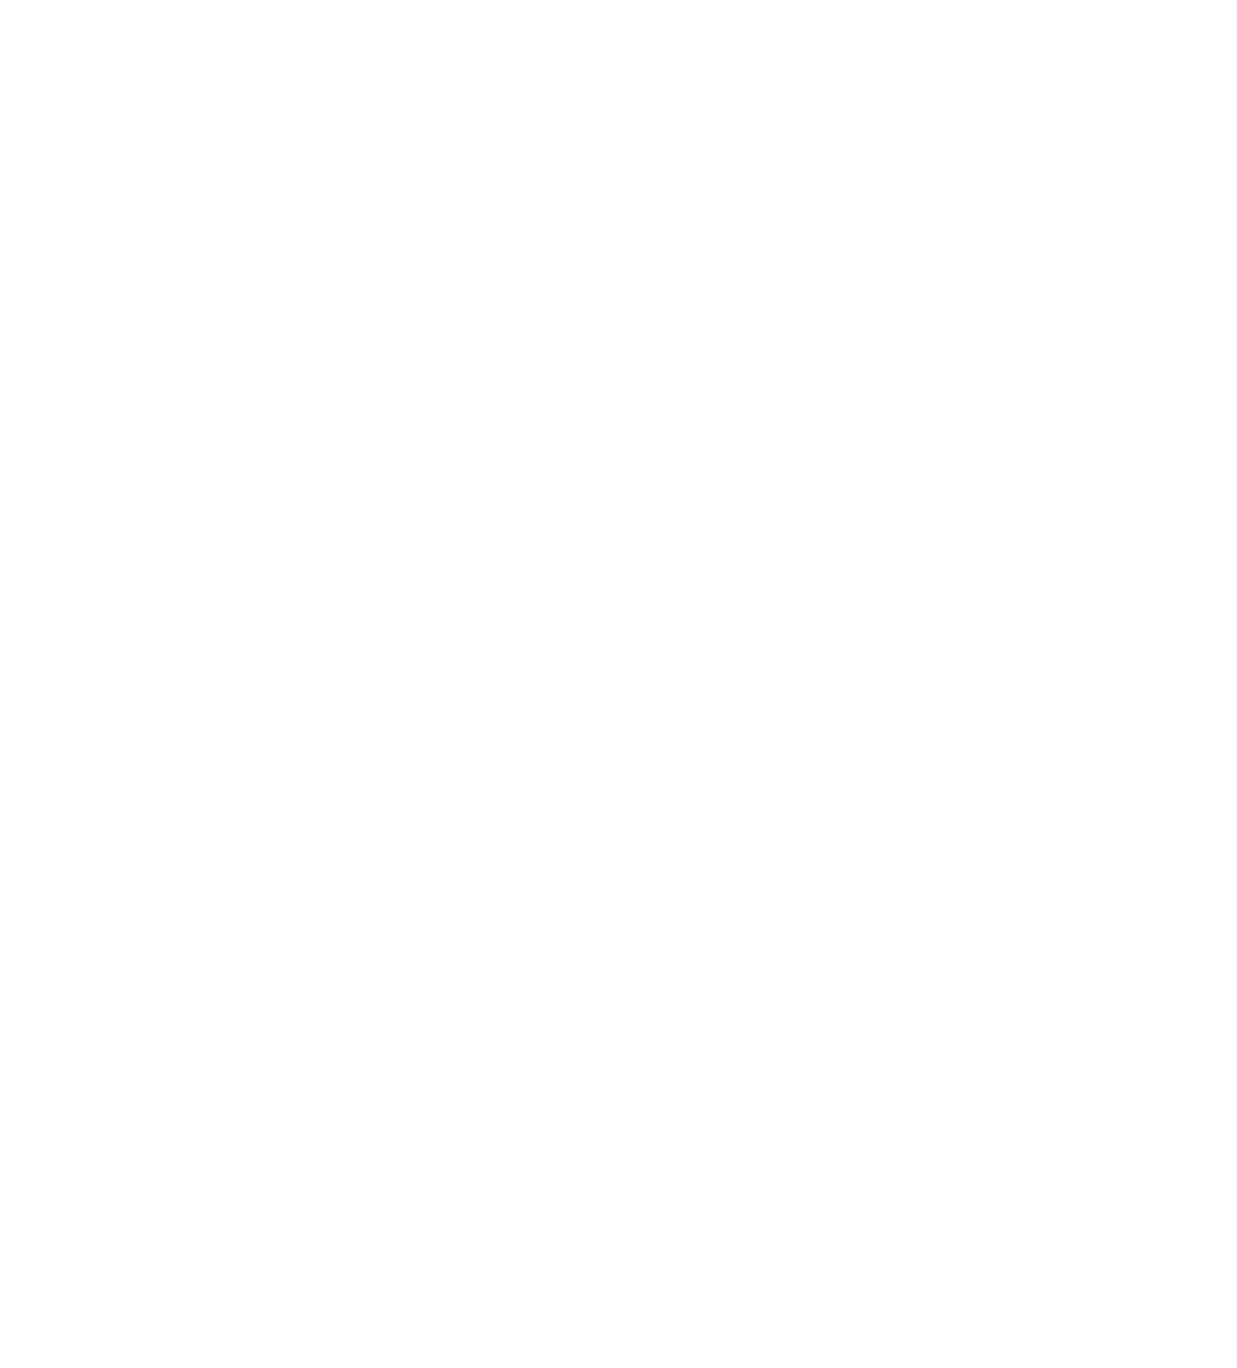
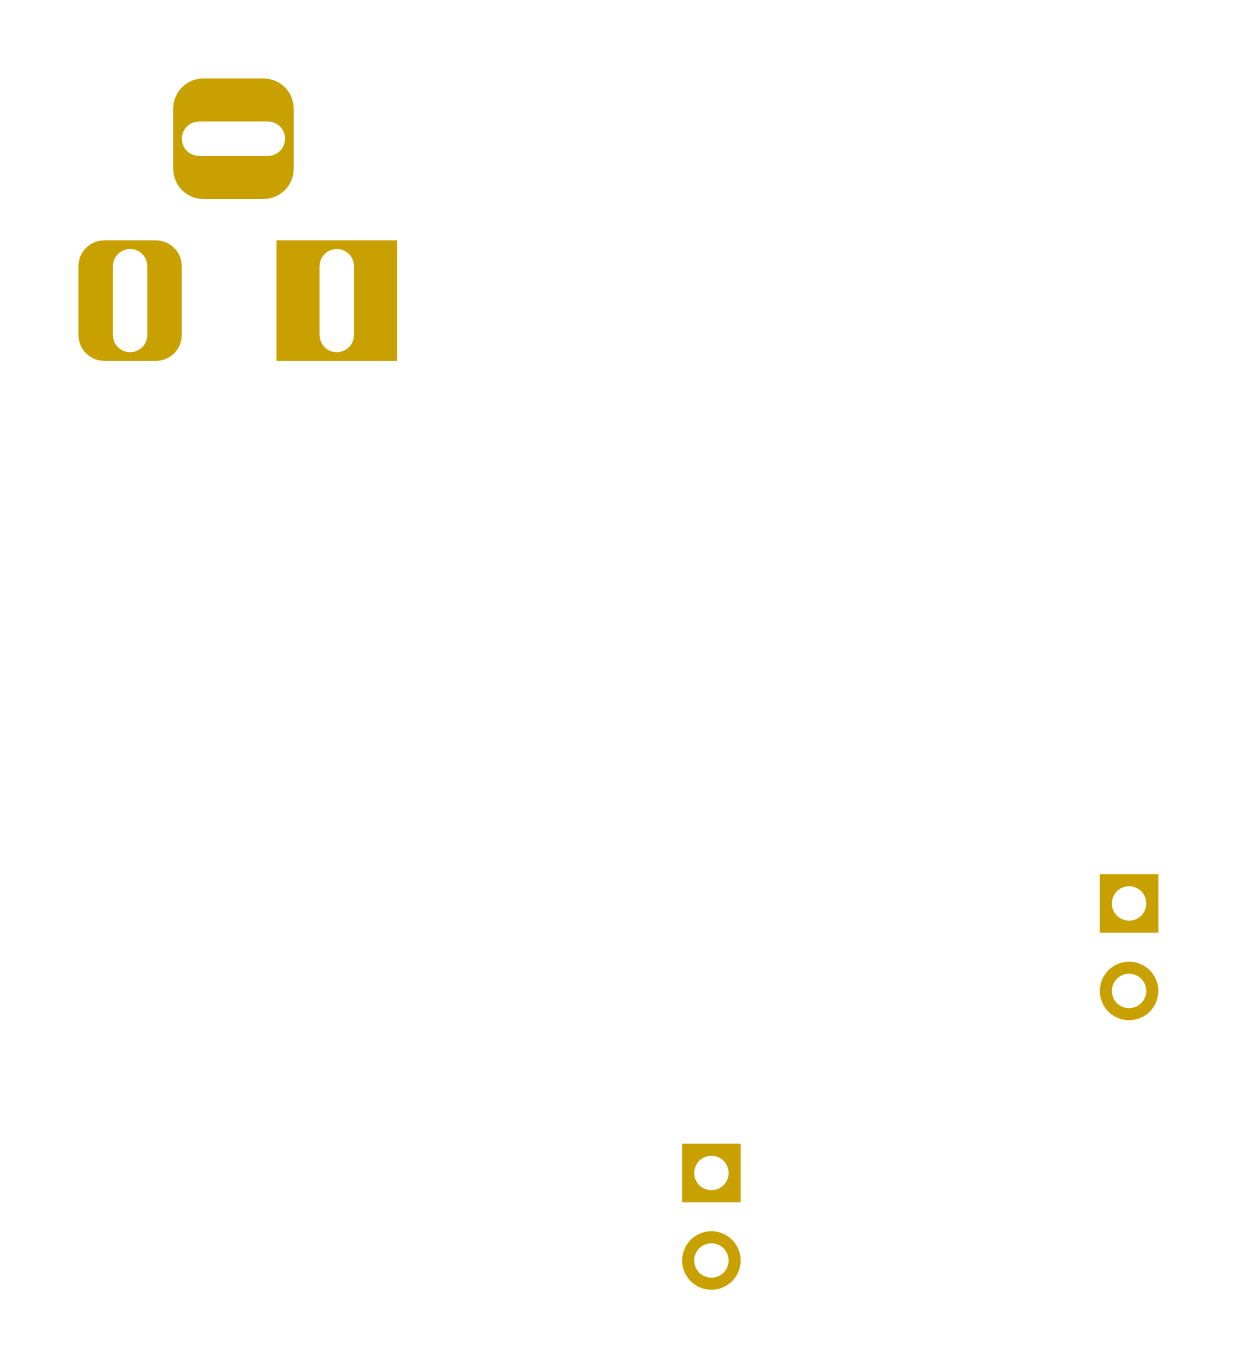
part: none -> (237, 219)
part: none -> (1129, 947)
part: none -> (711, 1216)

